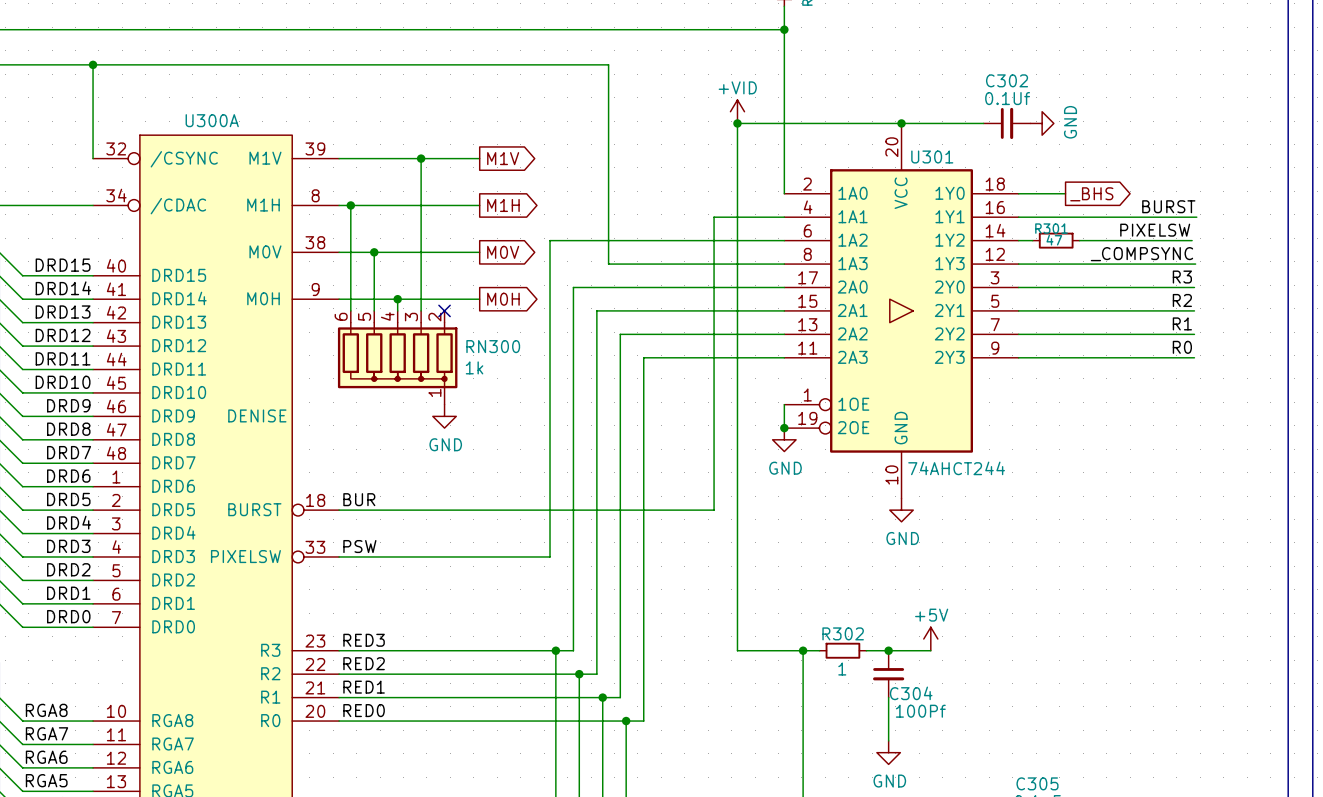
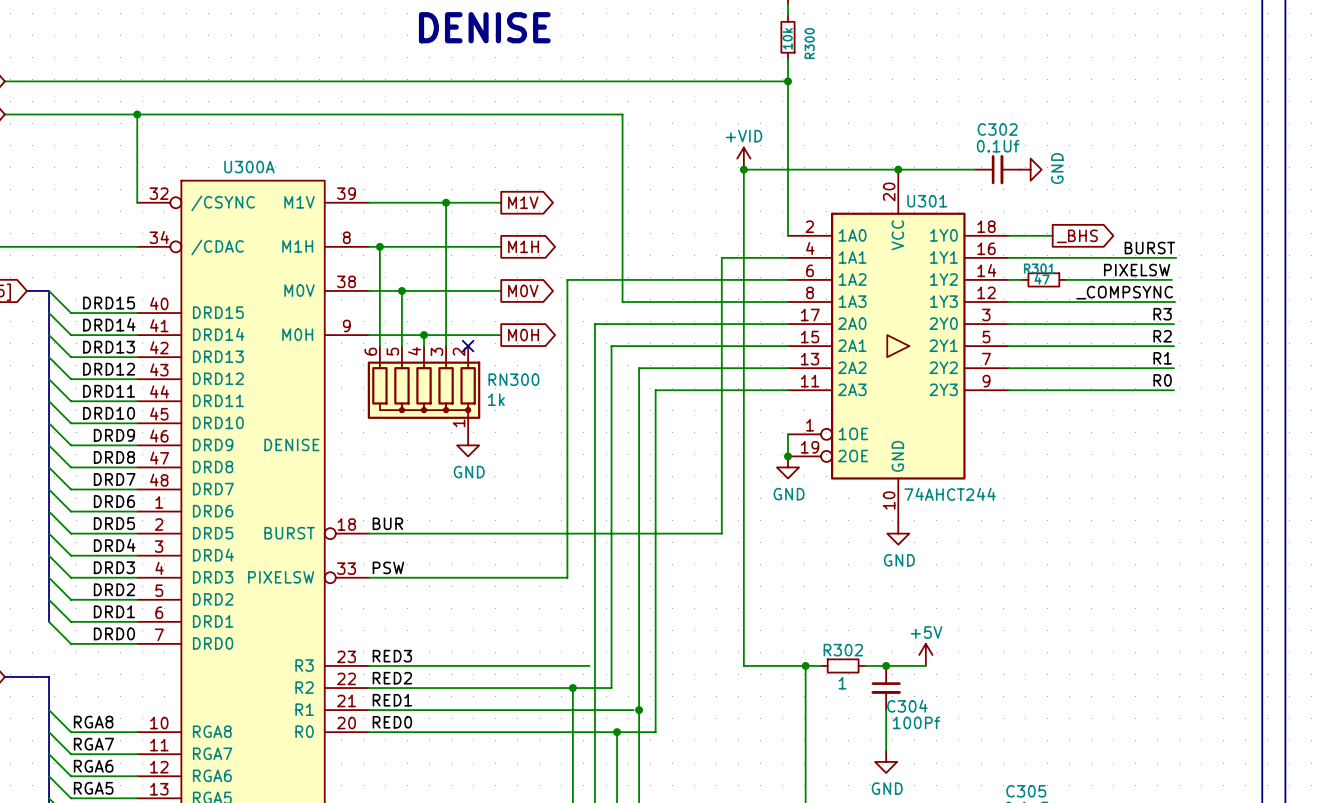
wire: (579, 287) (573, 287) (573, 650) -> (594, 324) (594, 688)
wire: (626, 334) (620, 334) (620, 697) -> (639, 368) (639, 732)
wire: (555, 650) (555, 674) -> none
junction: (555, 650) -> none
junction: none -> (572, 688)
junction: (579, 674) -> none
wire: (602, 697) (602, 721) -> none
junction: (602, 697) -> none
junction: none -> (639, 710)
junction: none -> (617, 732)
junction: (626, 721) -> none

